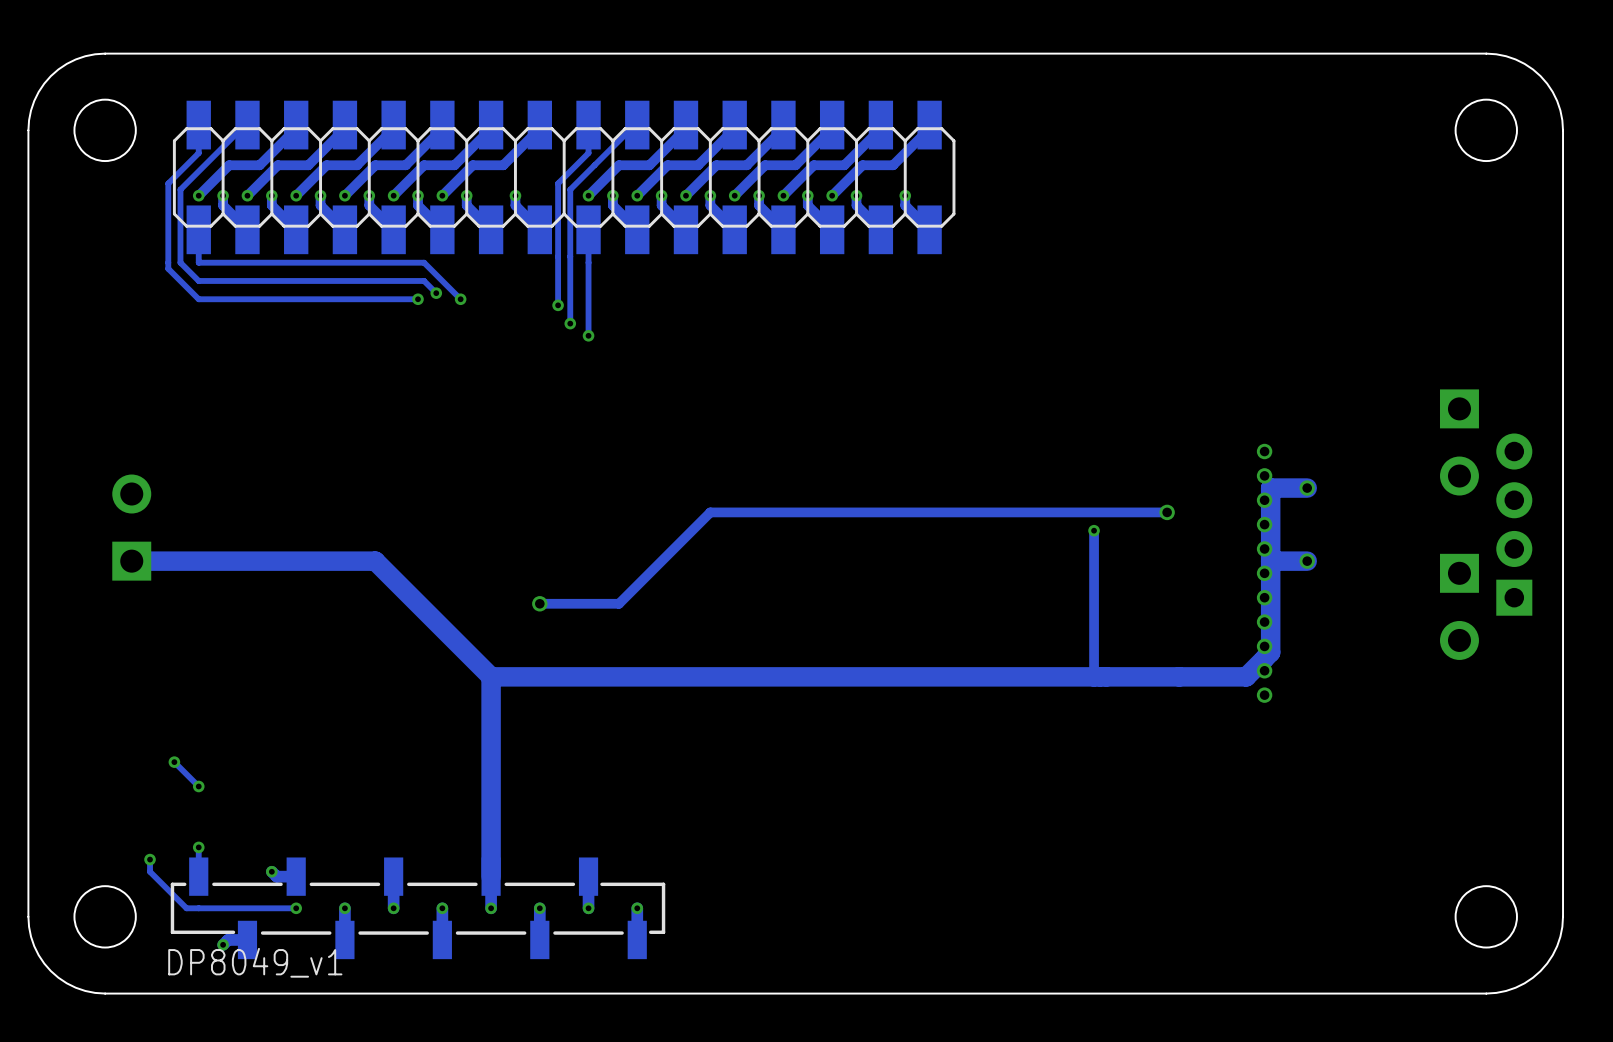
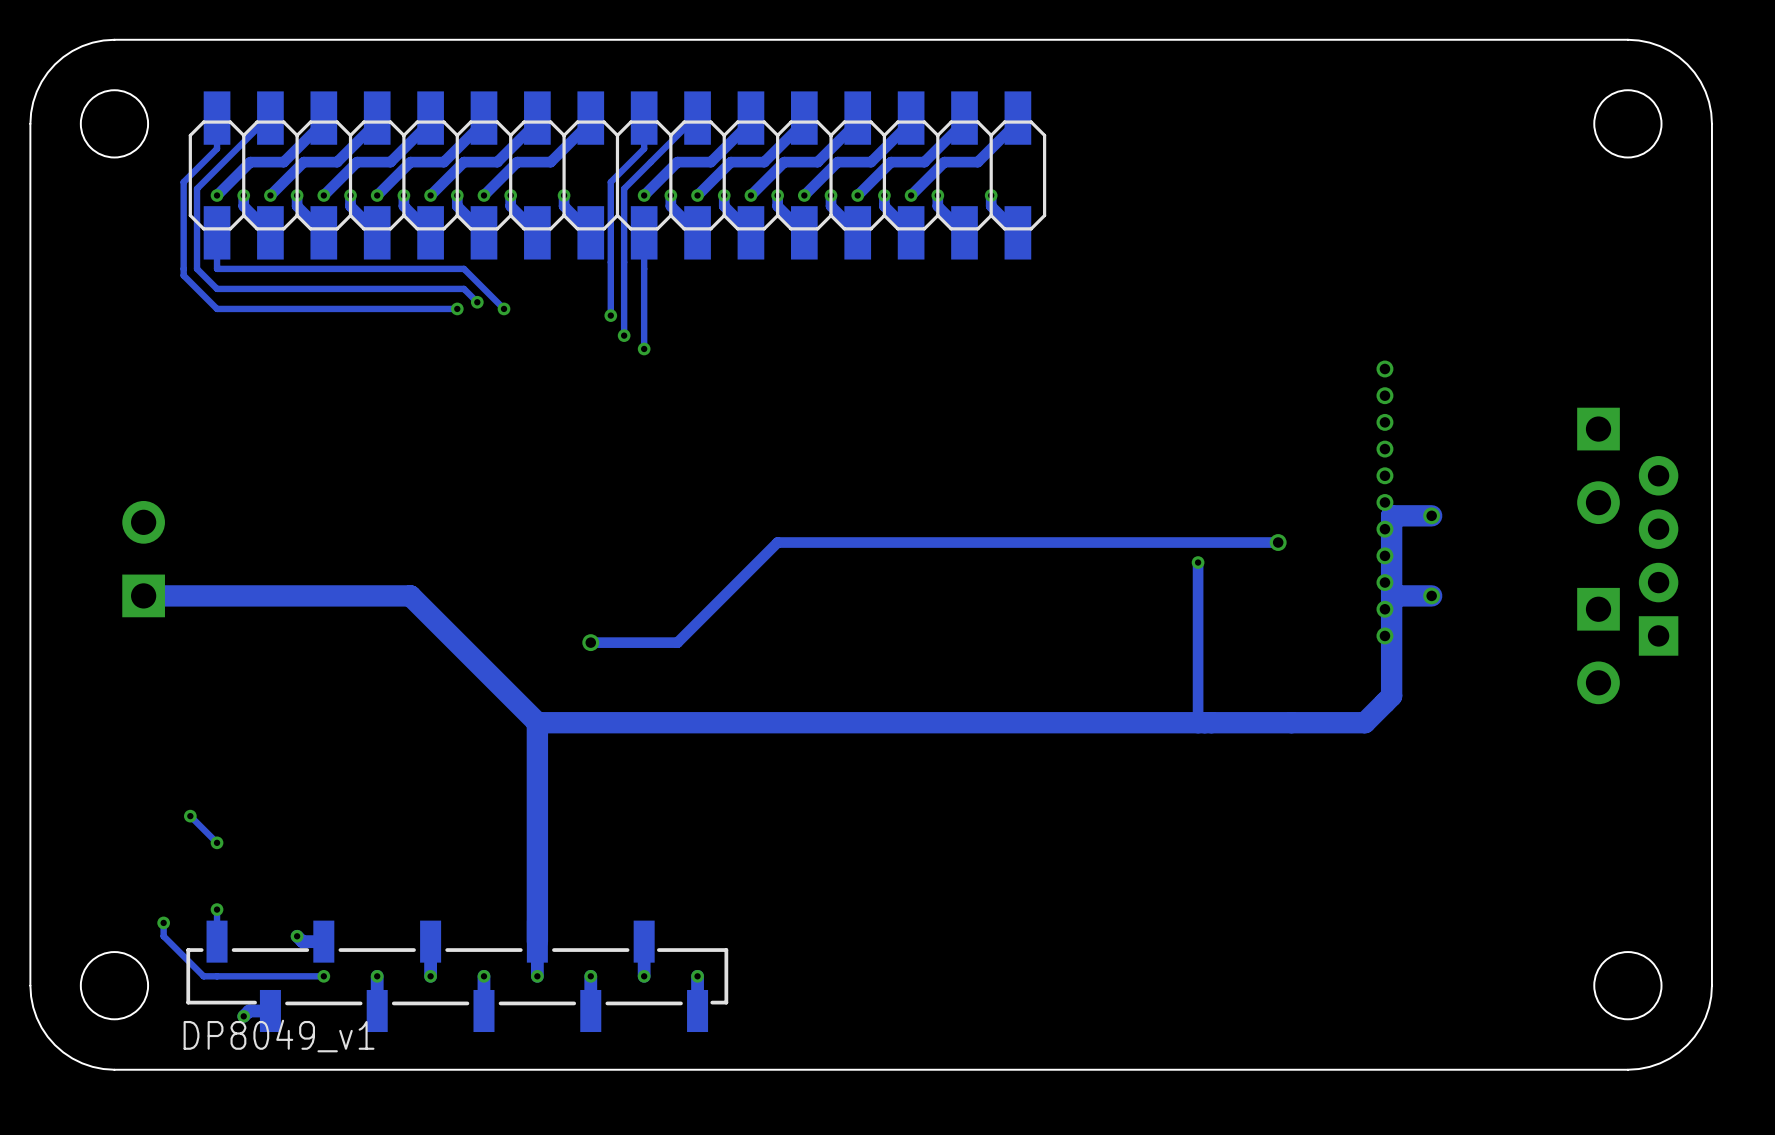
via: none -> (1384, 369)
via: none -> (1384, 395)
via: none -> (1384, 422)
via: none -> (1384, 449)
via: (1264, 622) -> none
via: (1264, 646) -> none
via: (1264, 670) -> none
via: (1264, 695) -> none

